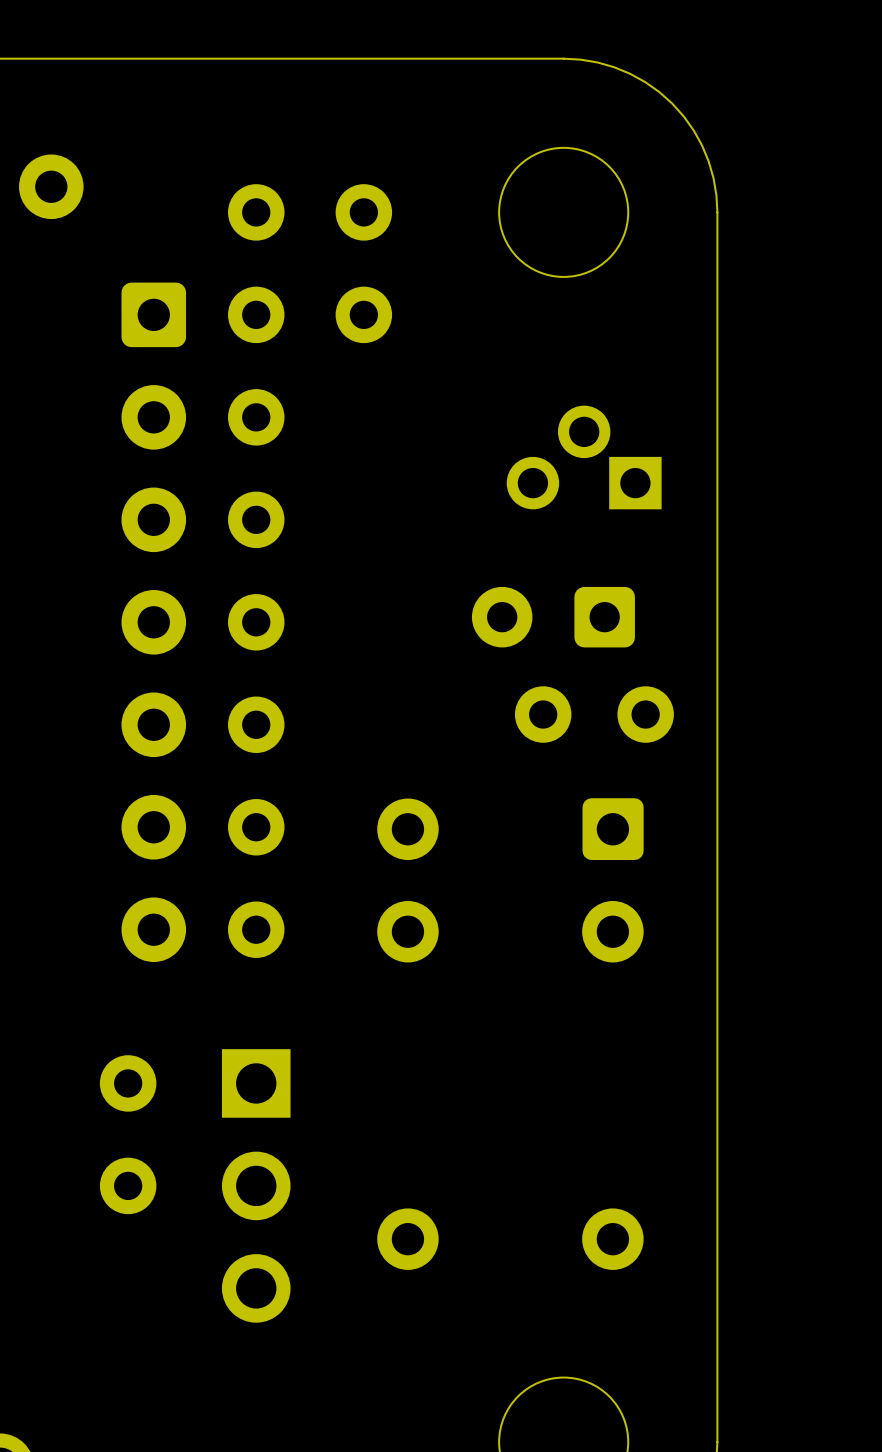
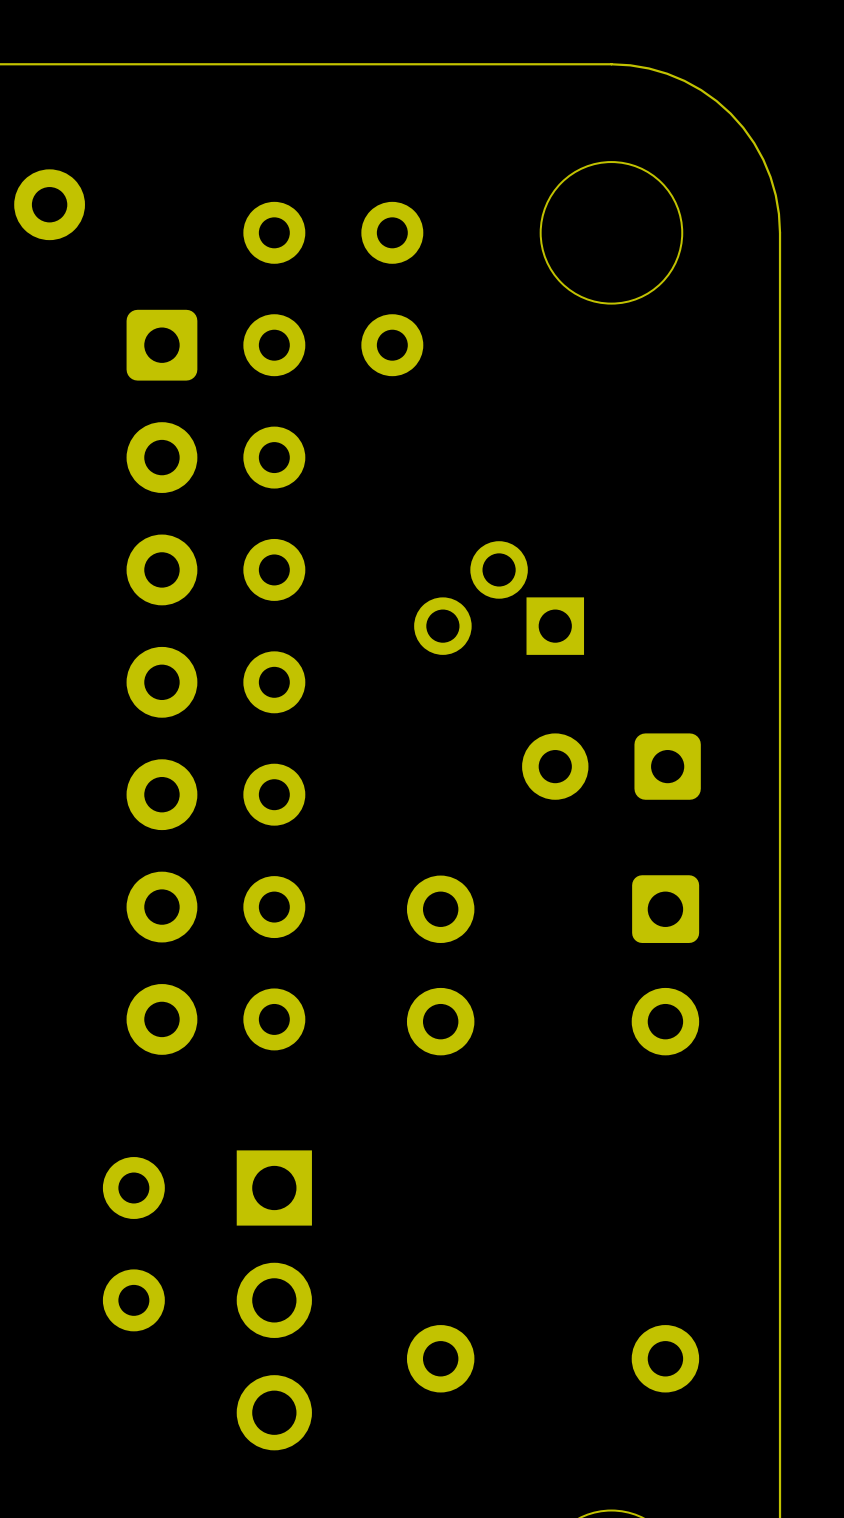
part position: (584, 457) -> (499, 598)
part: (553, 617) -> none
part footprint: [514, 686, 674, 743] -> [522, 733, 701, 800]

